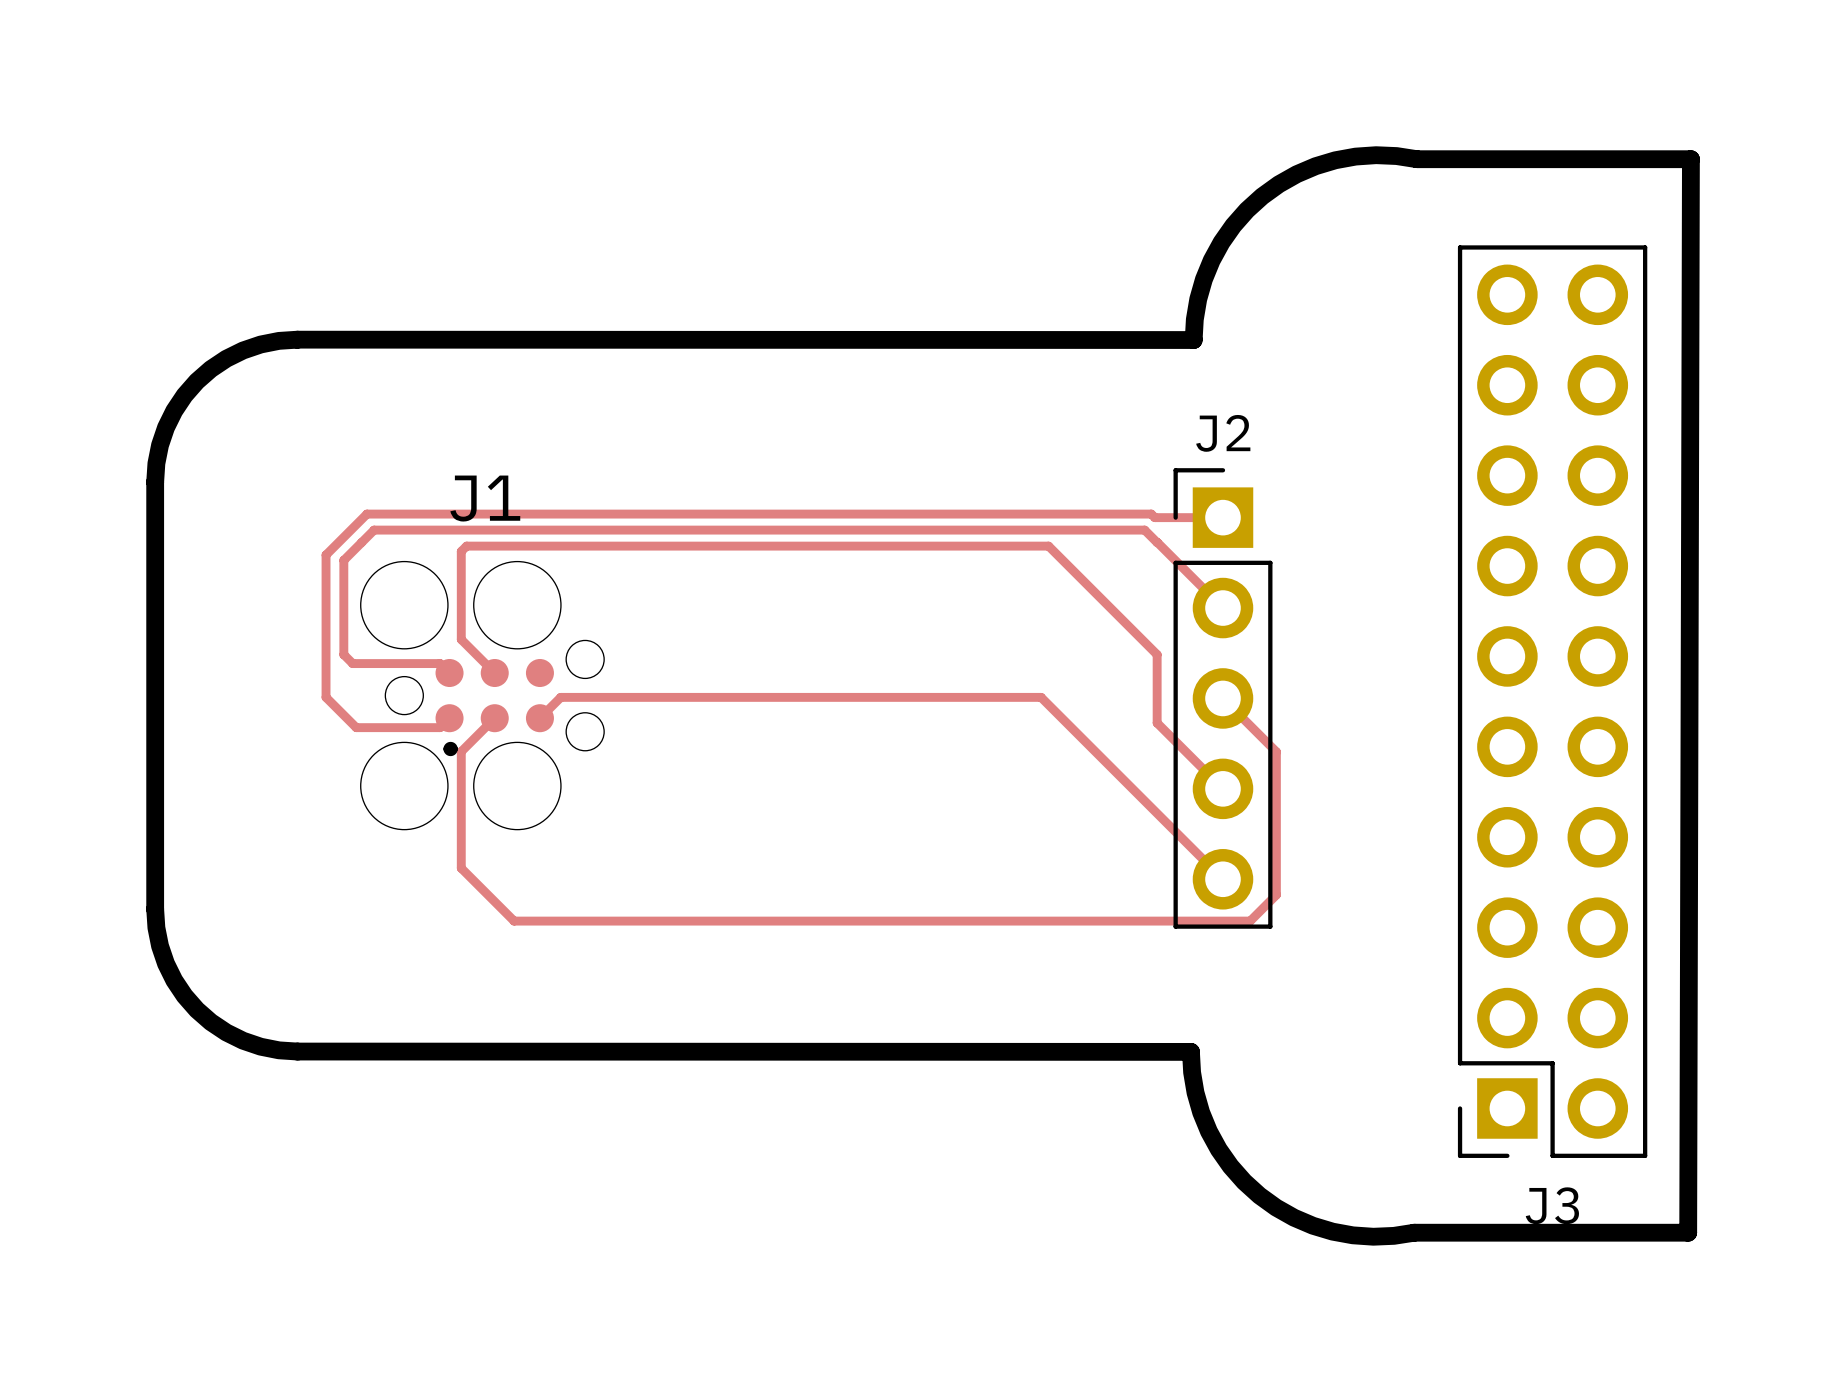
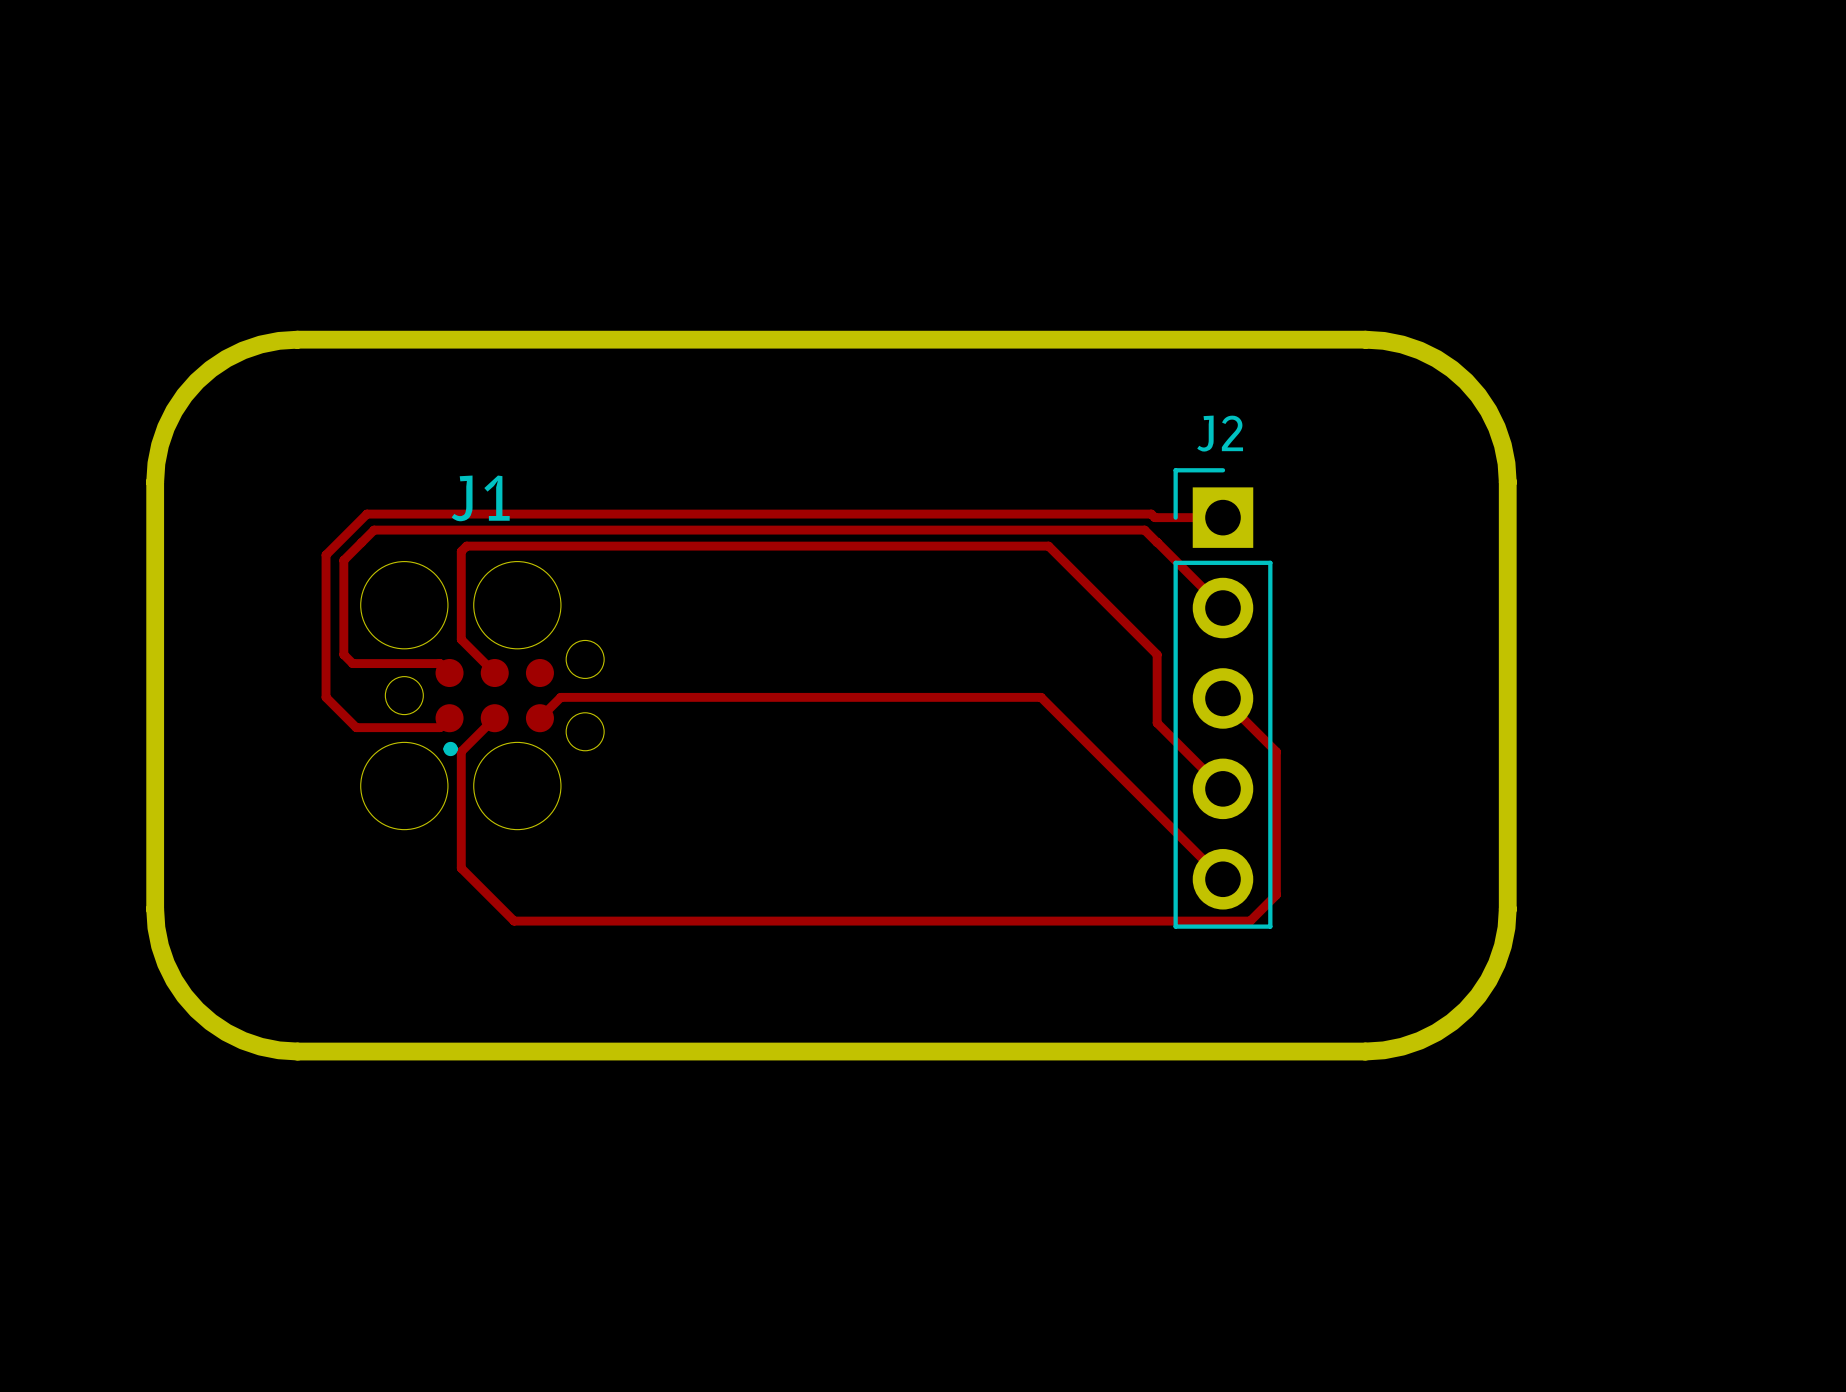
board edge: (297, 339) (1193, 340) (1198, 299) (1203, 279) (1221, 242) (1246, 210) (1262, 196) (1296, 174) (1315, 166) (1335, 160) (1376, 155) (1416, 159) (1690, 159) (1688, 1232) (1414, 1232) (1373, 1236) (1352, 1235) (1312, 1225) (1294, 1217) (1259, 1195) (1230, 1166) (1218, 1149) (1201, 1112) (1192, 1072) (1190, 1051) (297, 1051) -> (297, 339) (1383, 340) (1419, 350) (1452, 369) (1466, 381) (1488, 410) (1496, 427) (1502, 445) (1507, 482) (1506, 927) (1496, 963) (1478, 995) (1452, 1022) (1419, 1040) (1402, 1046) (1365, 1051) (297, 1051)
J3: (1552, 701) -> none

